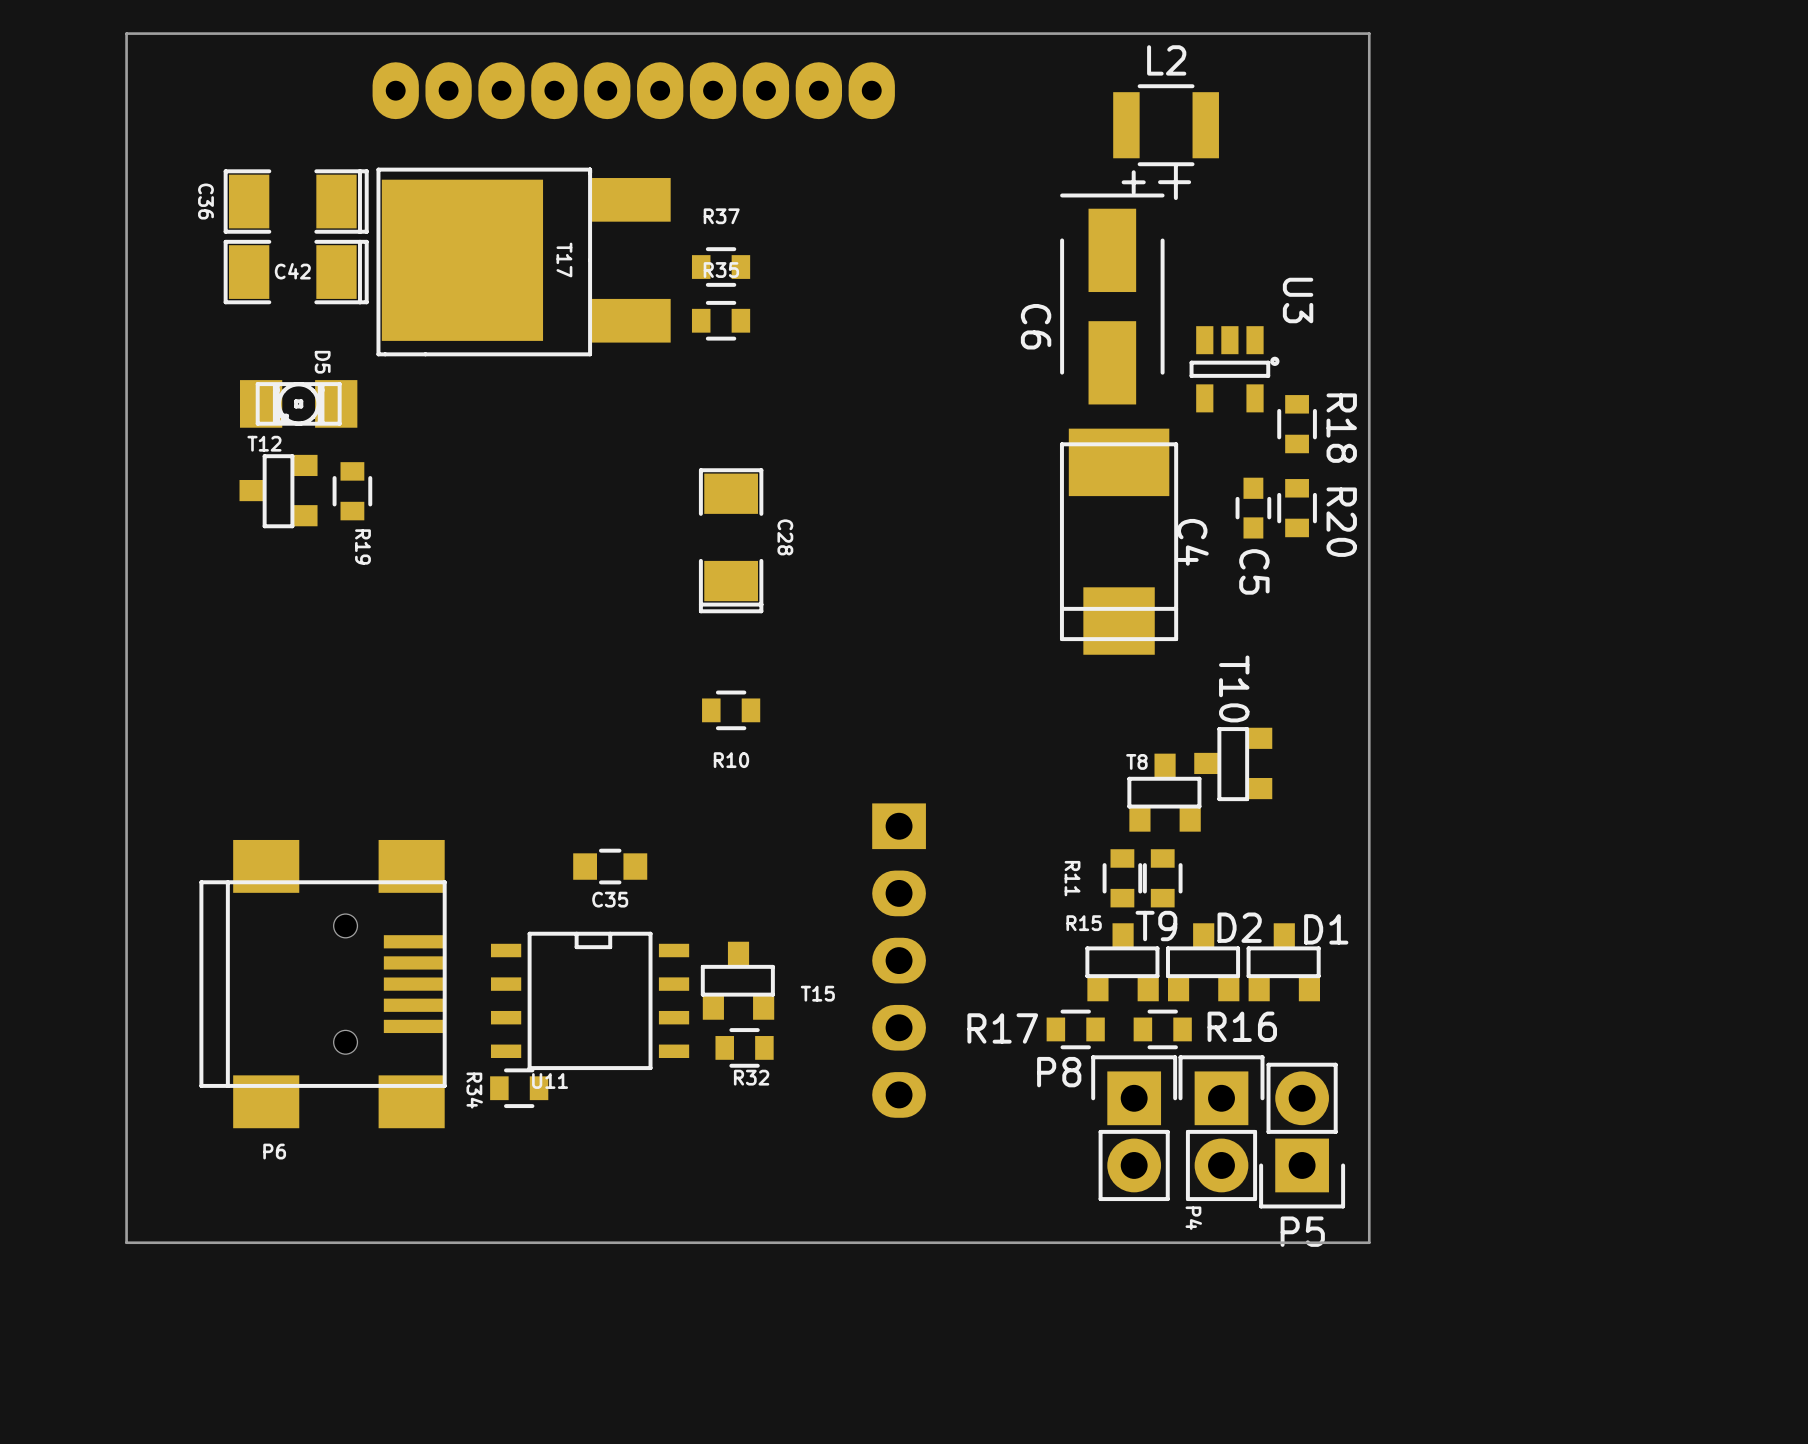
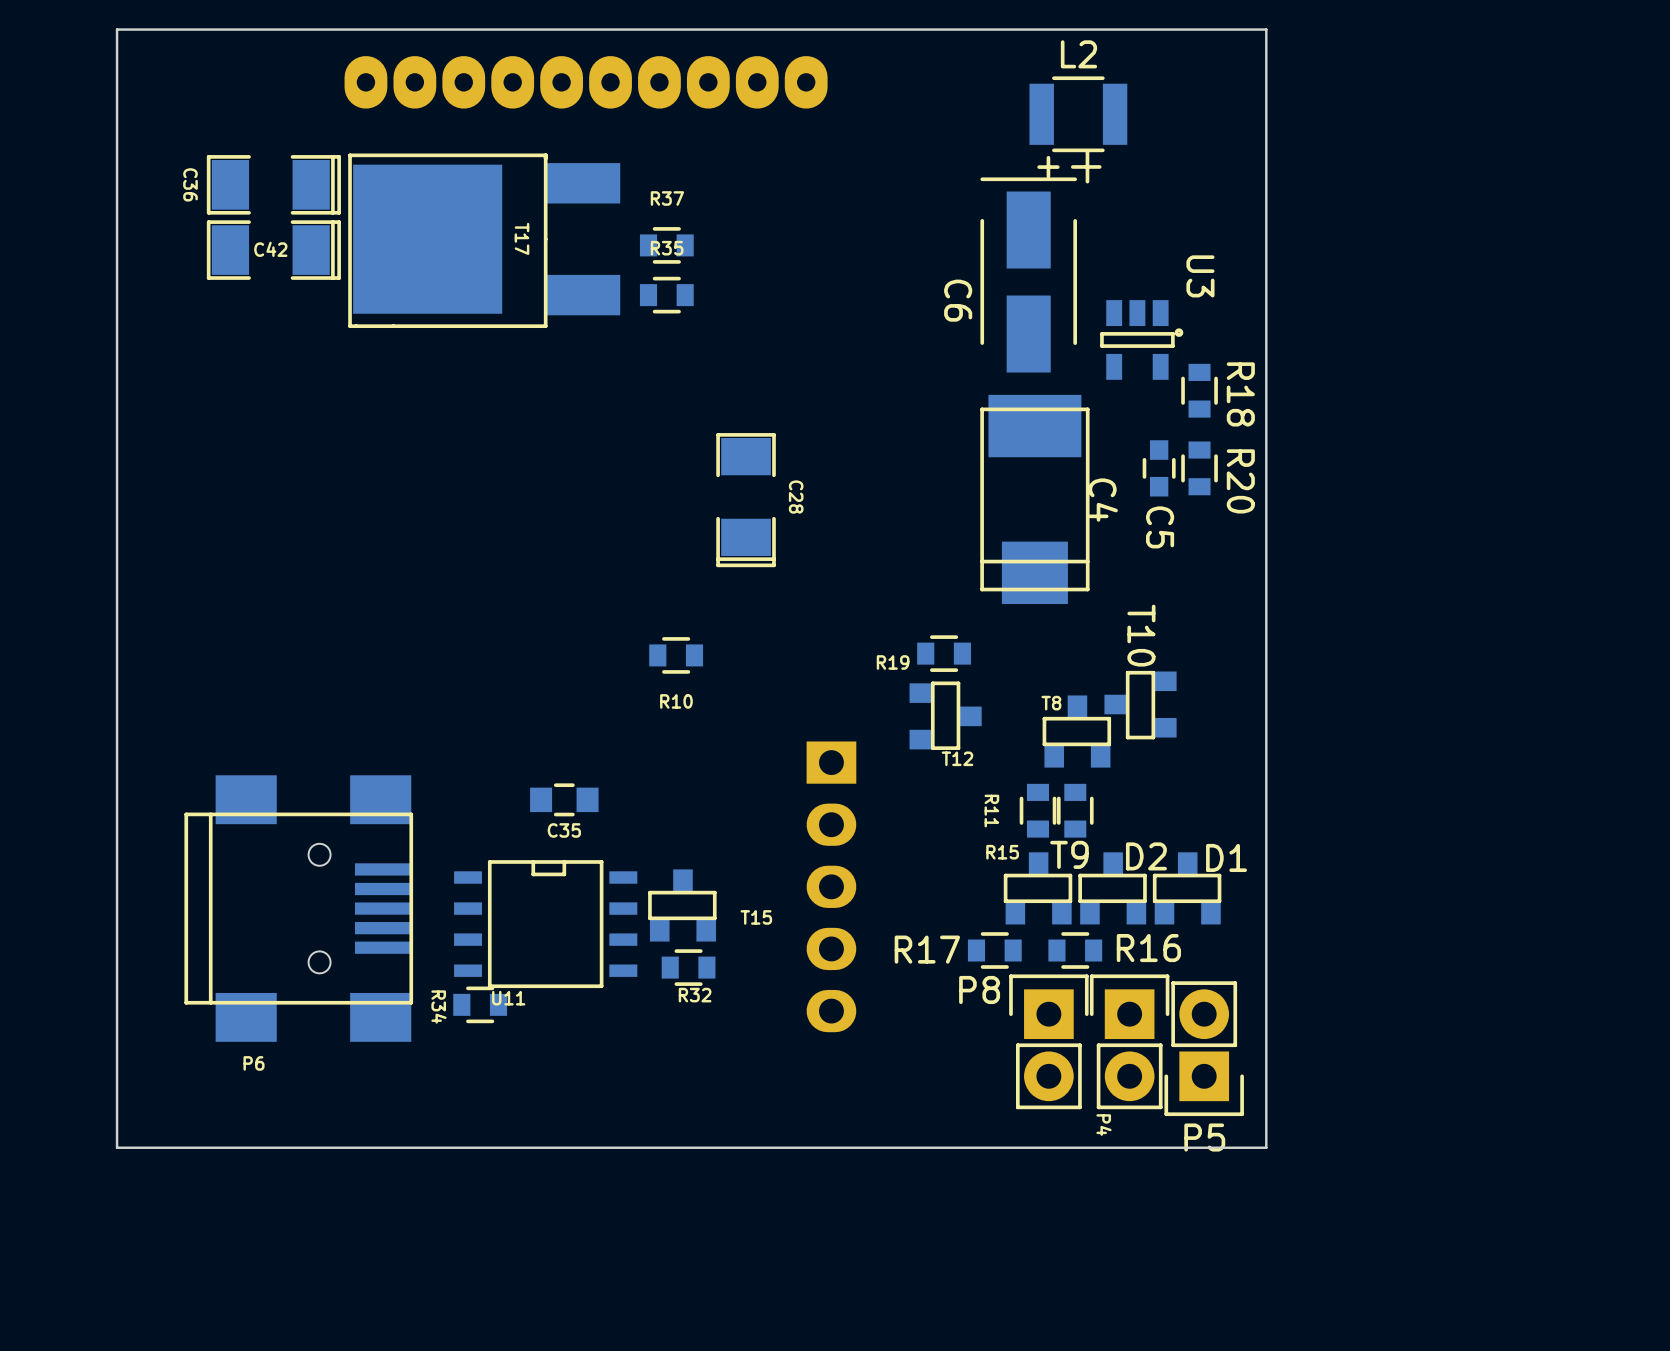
D5: (298, 403) -> none
T12 rotation: 0° (278, 491) -> 180° (945, 715)
T12 position: (278, 491) -> (945, 715)
R19 rotation: 0° (352, 491) -> 90° clockwise (944, 653)
R19 position: (352, 491) -> (944, 653)
C28 position: (731, 540) -> (746, 500)

